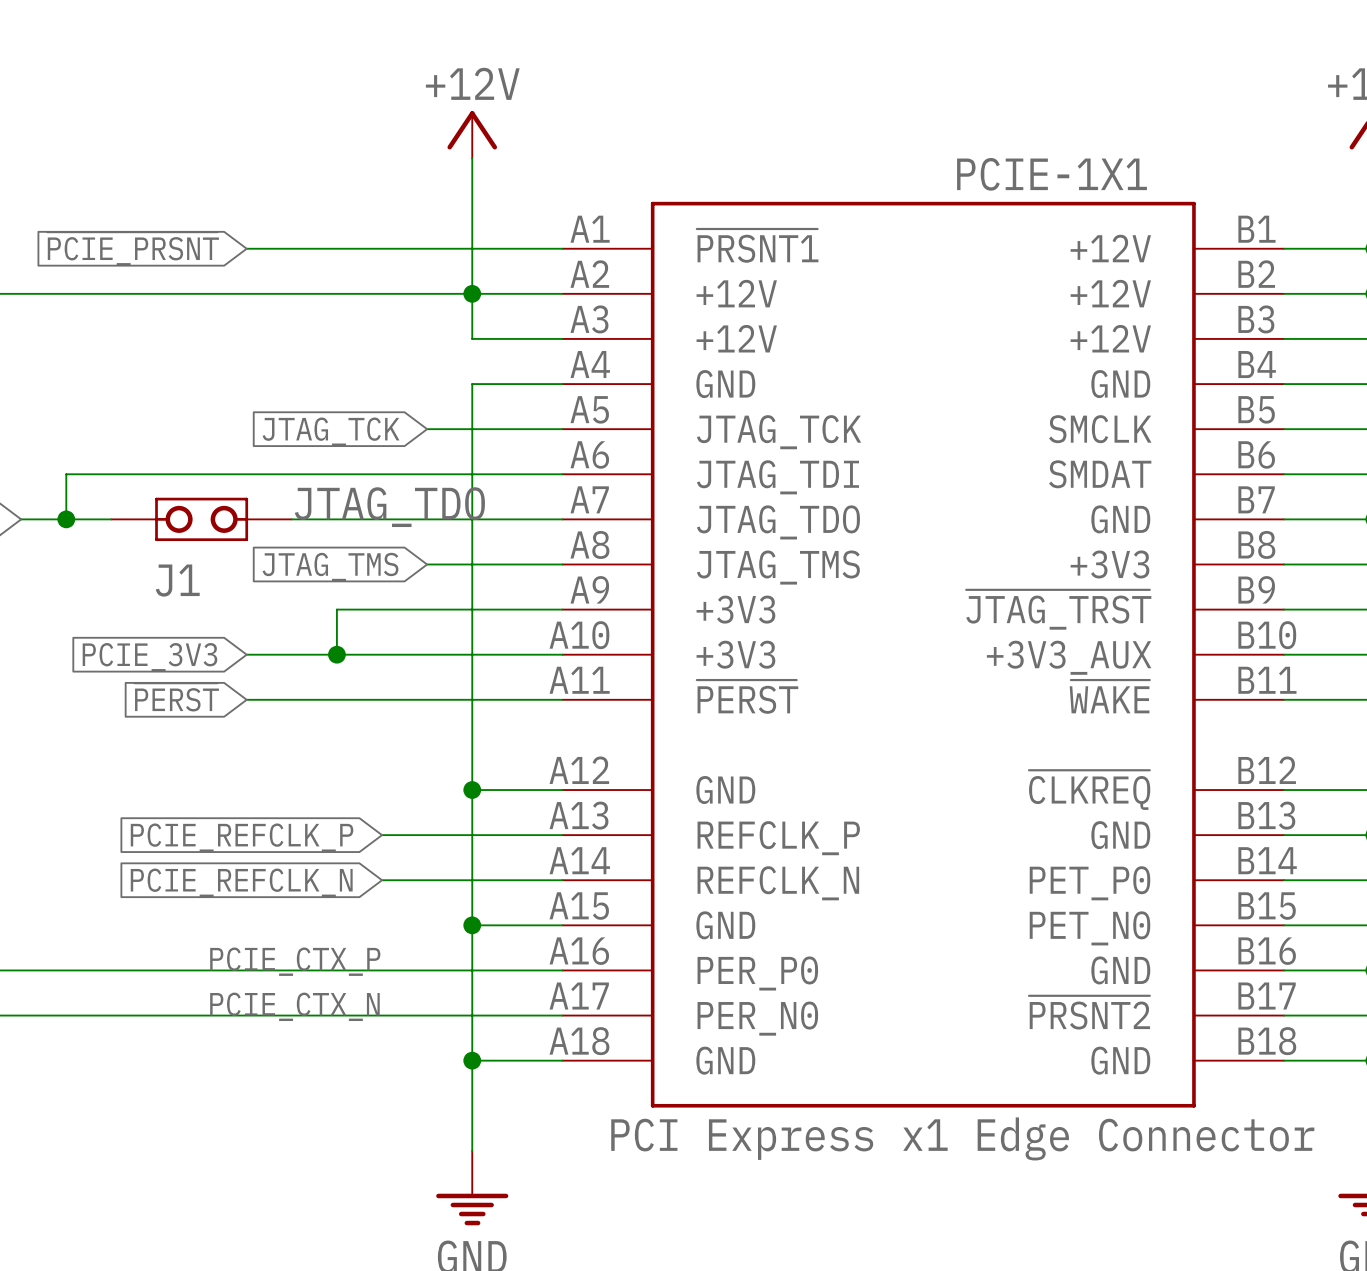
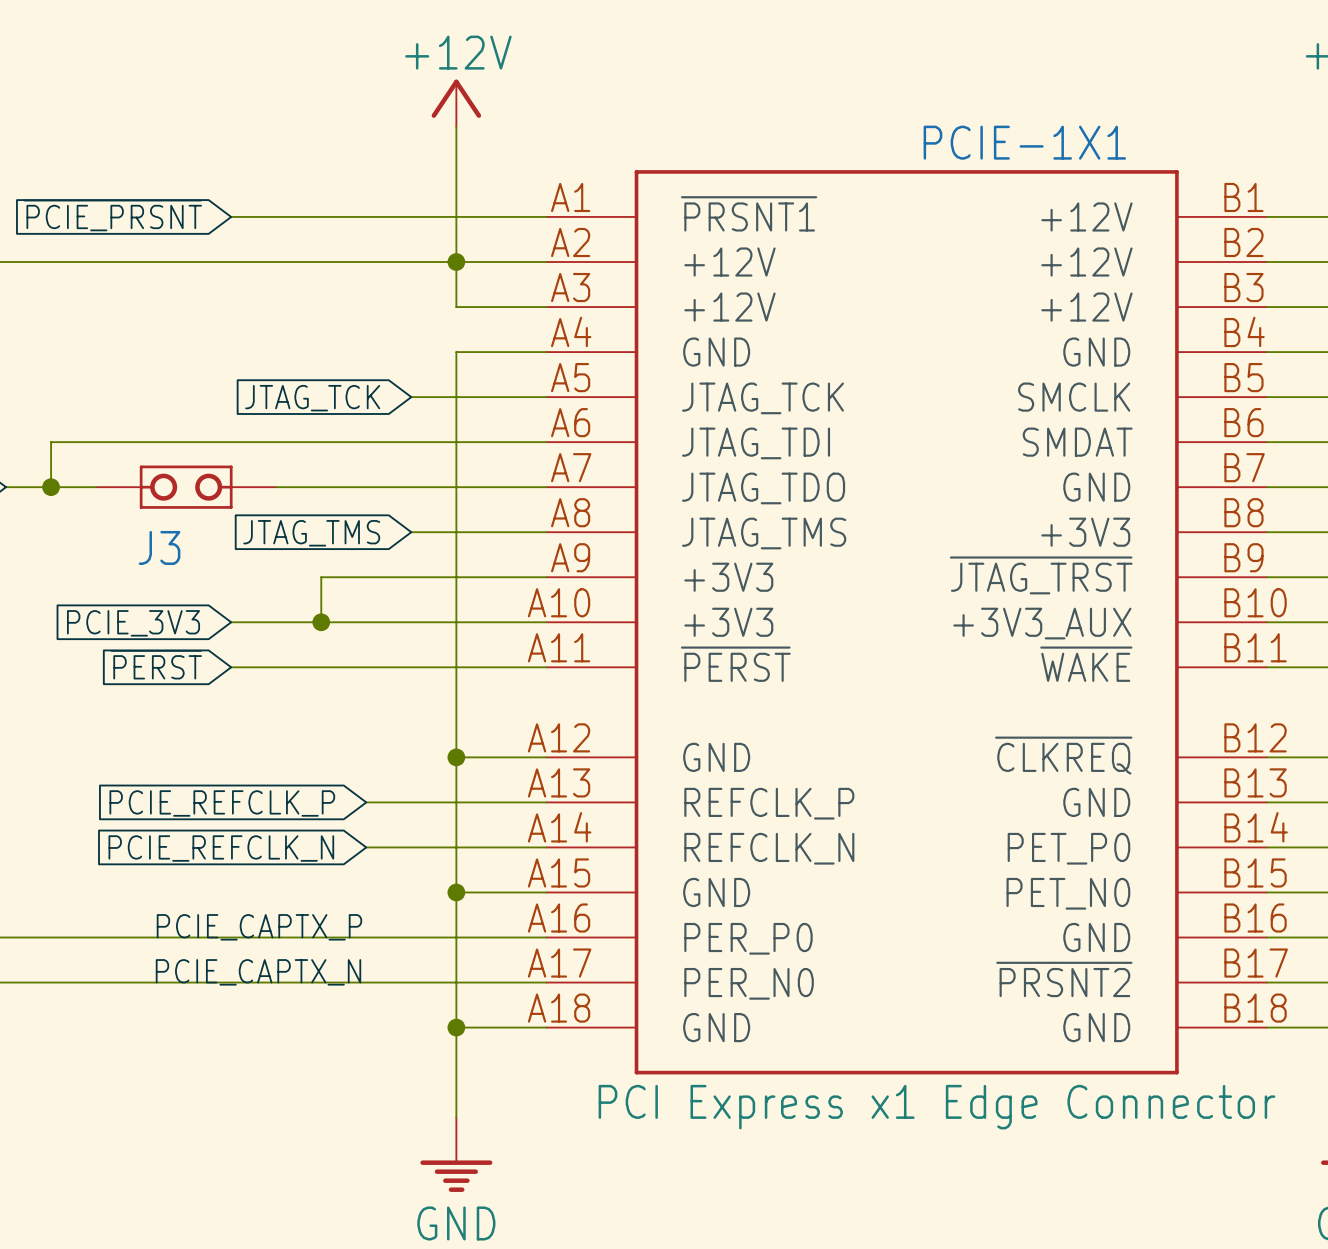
label: JTAG_TDO (389, 507) -> none
J1 name: J1 (177, 580) -> J3 (159, 547)
label: PCIE_CTX_P (295, 961) -> PCIE_CAPTX_P (259, 927)
label: PCIE_CTX_N (294, 1006) -> PCIE_CAPTX_N (258, 972)

